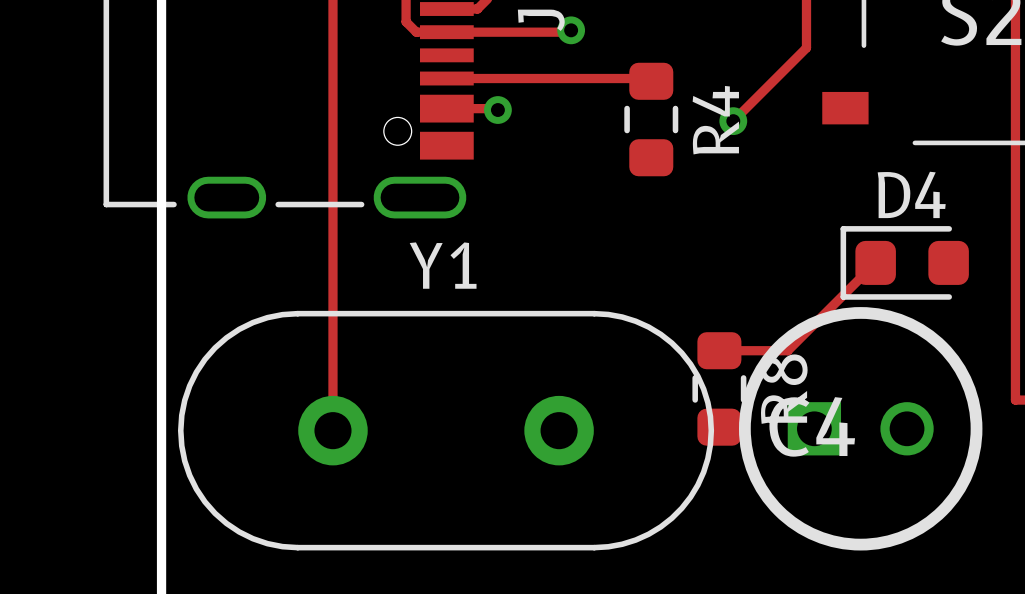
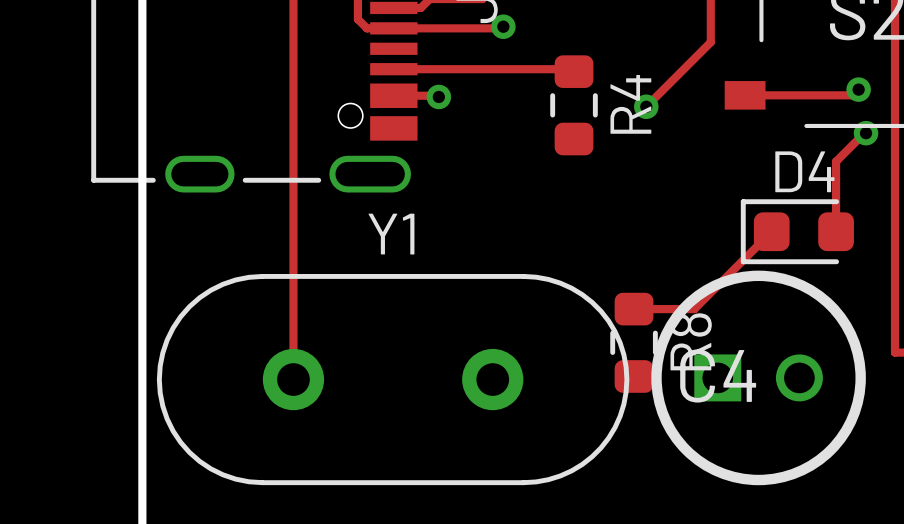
track: none -> (858, 89) (852, 95) (745, 95)
via: none -> (858, 89)
track: none -> (866, 133) (836, 161) (836, 231)
via: none -> (866, 133)

